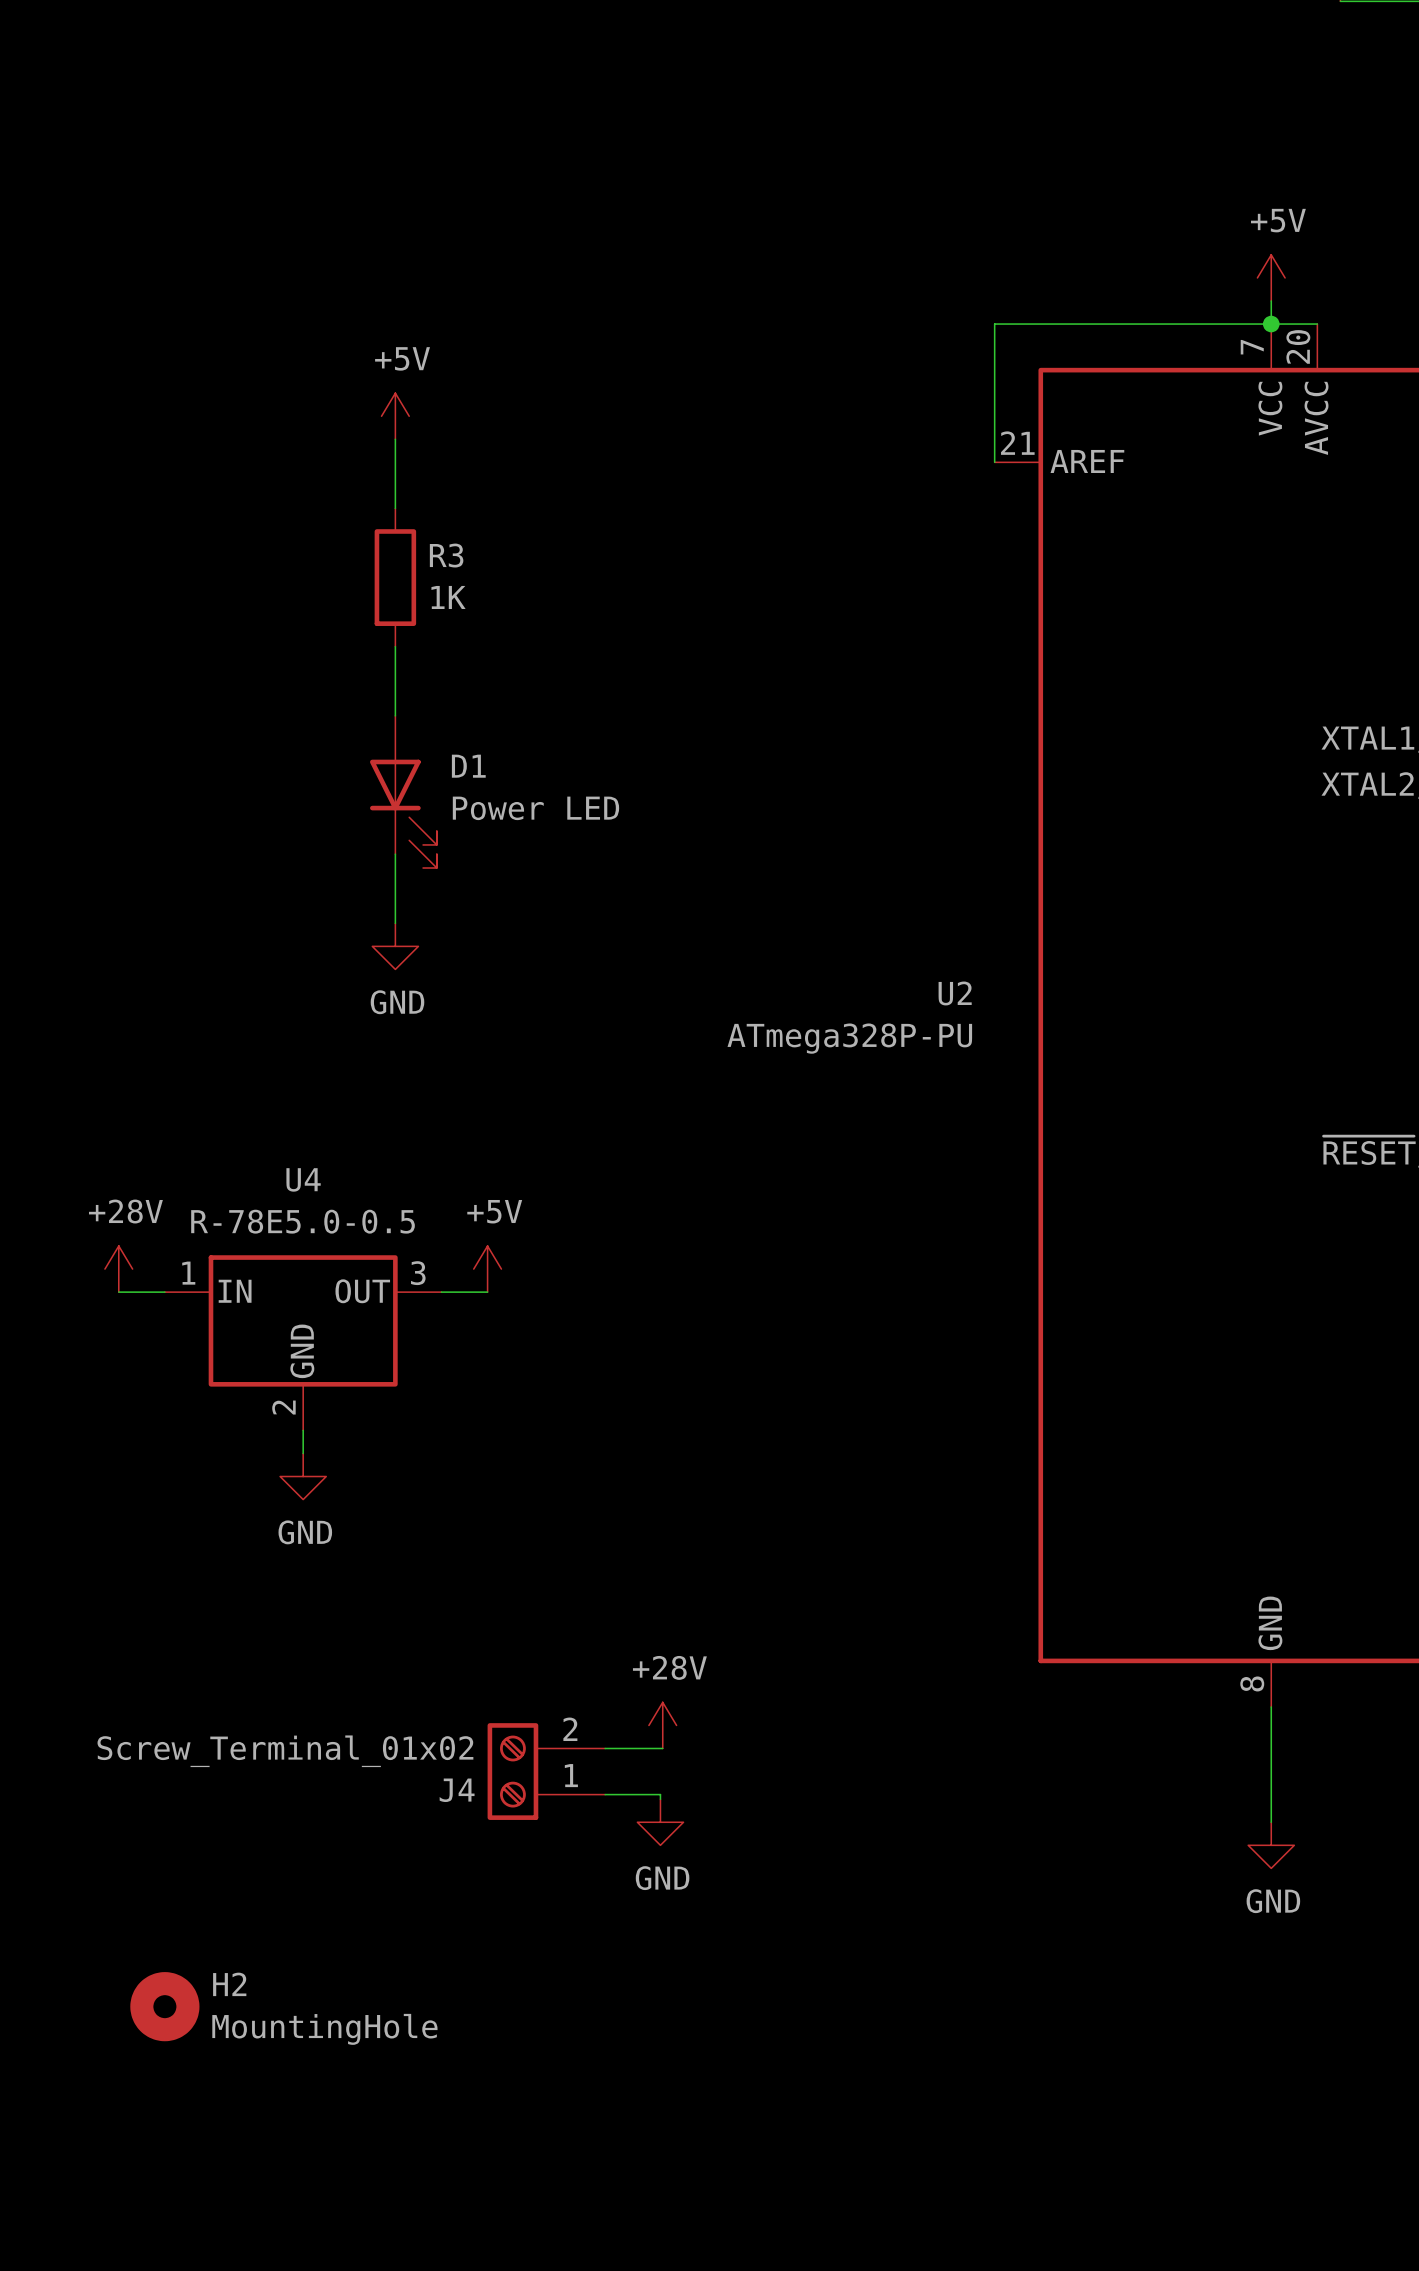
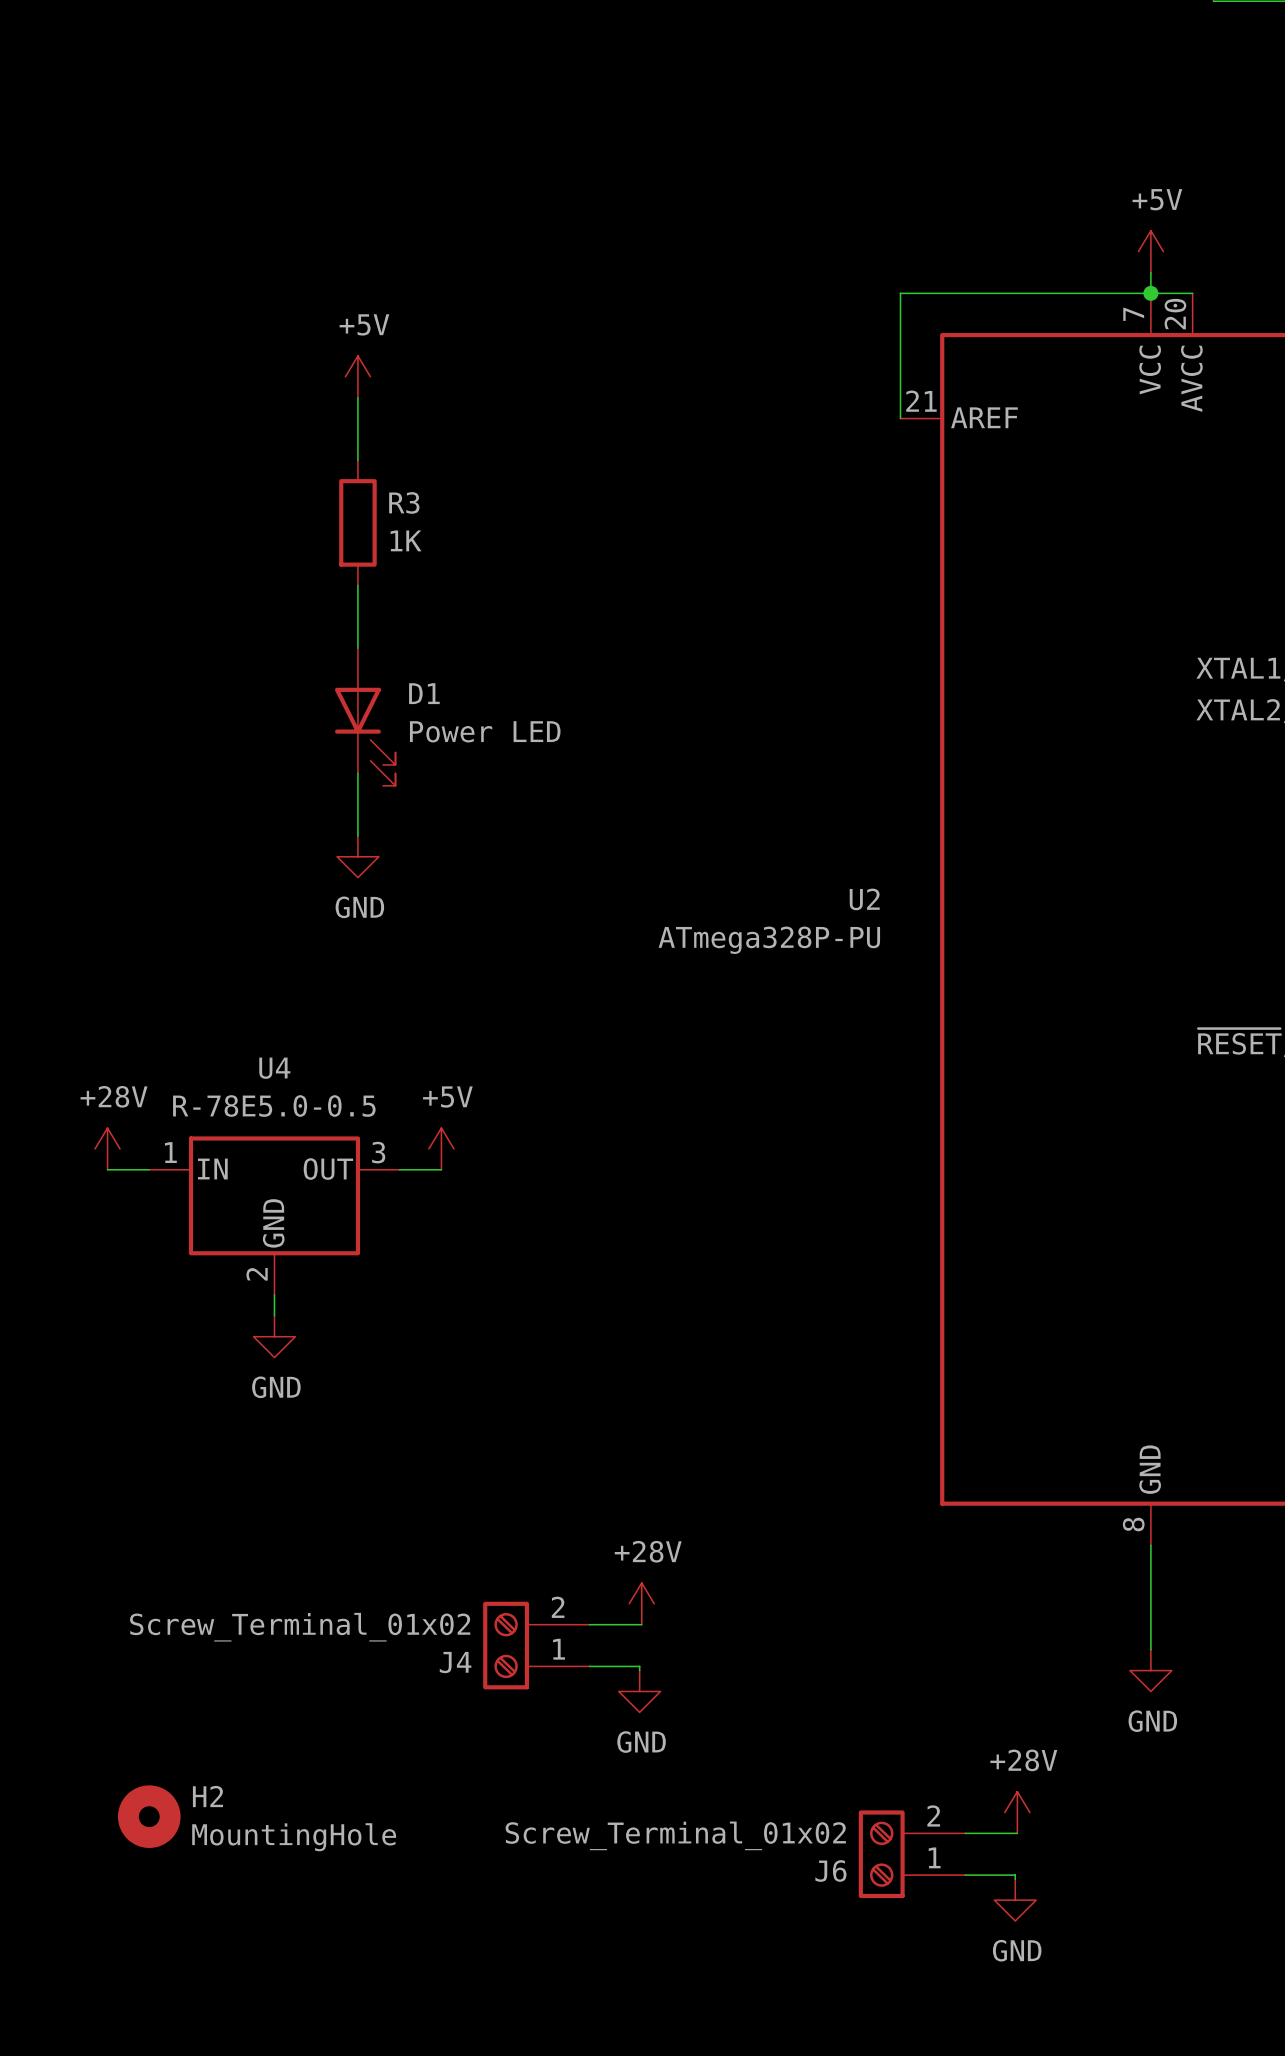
power symbol position: +28V (662, 1725) -> +28V (641, 1603)
wire: (605, 1748) (662, 1748) -> none
J4 position: (546, 1771) -> (536, 1645)
wire: (660, 1794) (660, 1799) -> (597, 1624) (641, 1624)
power symbol position: GND (660, 1822) -> GND (639, 1691)
wire: none -> (589, 1666) (639, 1666) (639, 1670)
power symbol: none -> +28V (1017, 1812)
wire: none -> (965, 1833) (1017, 1833)
J6: none -> Screw_Terminal_01x02 (911, 1854)
wire: none -> (965, 1875) (1015, 1875) (1015, 1879)
power symbol: none -> GND (1015, 1900)

